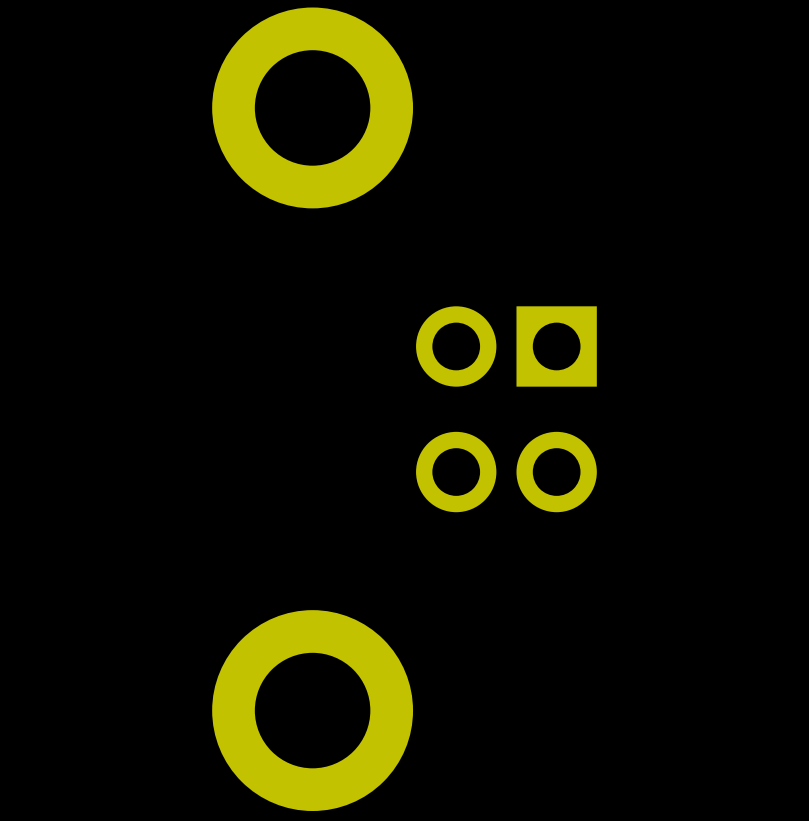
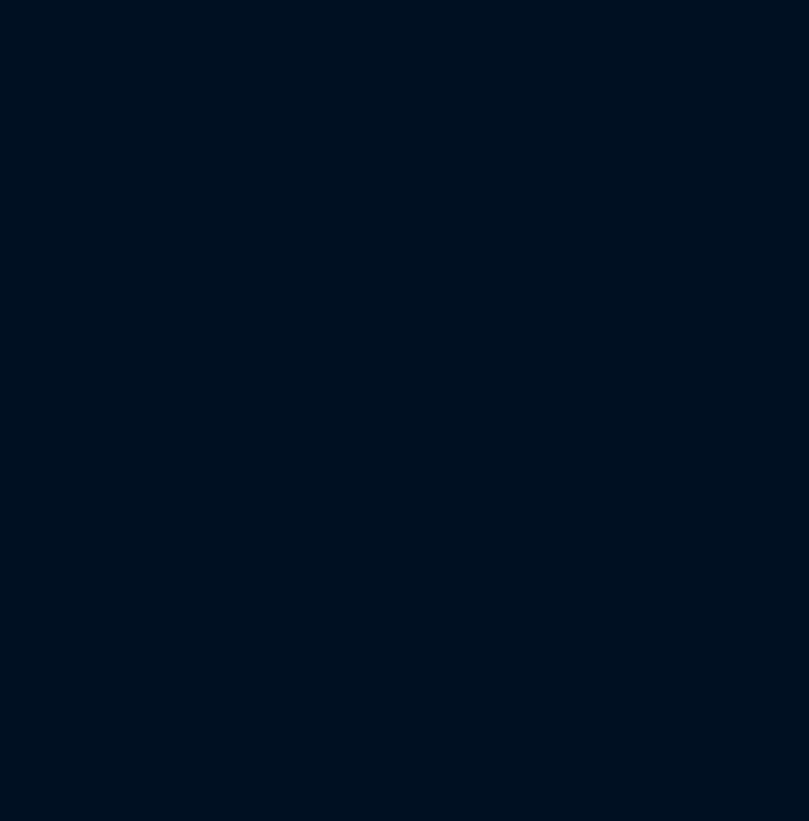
part: (404, 409) -> none

